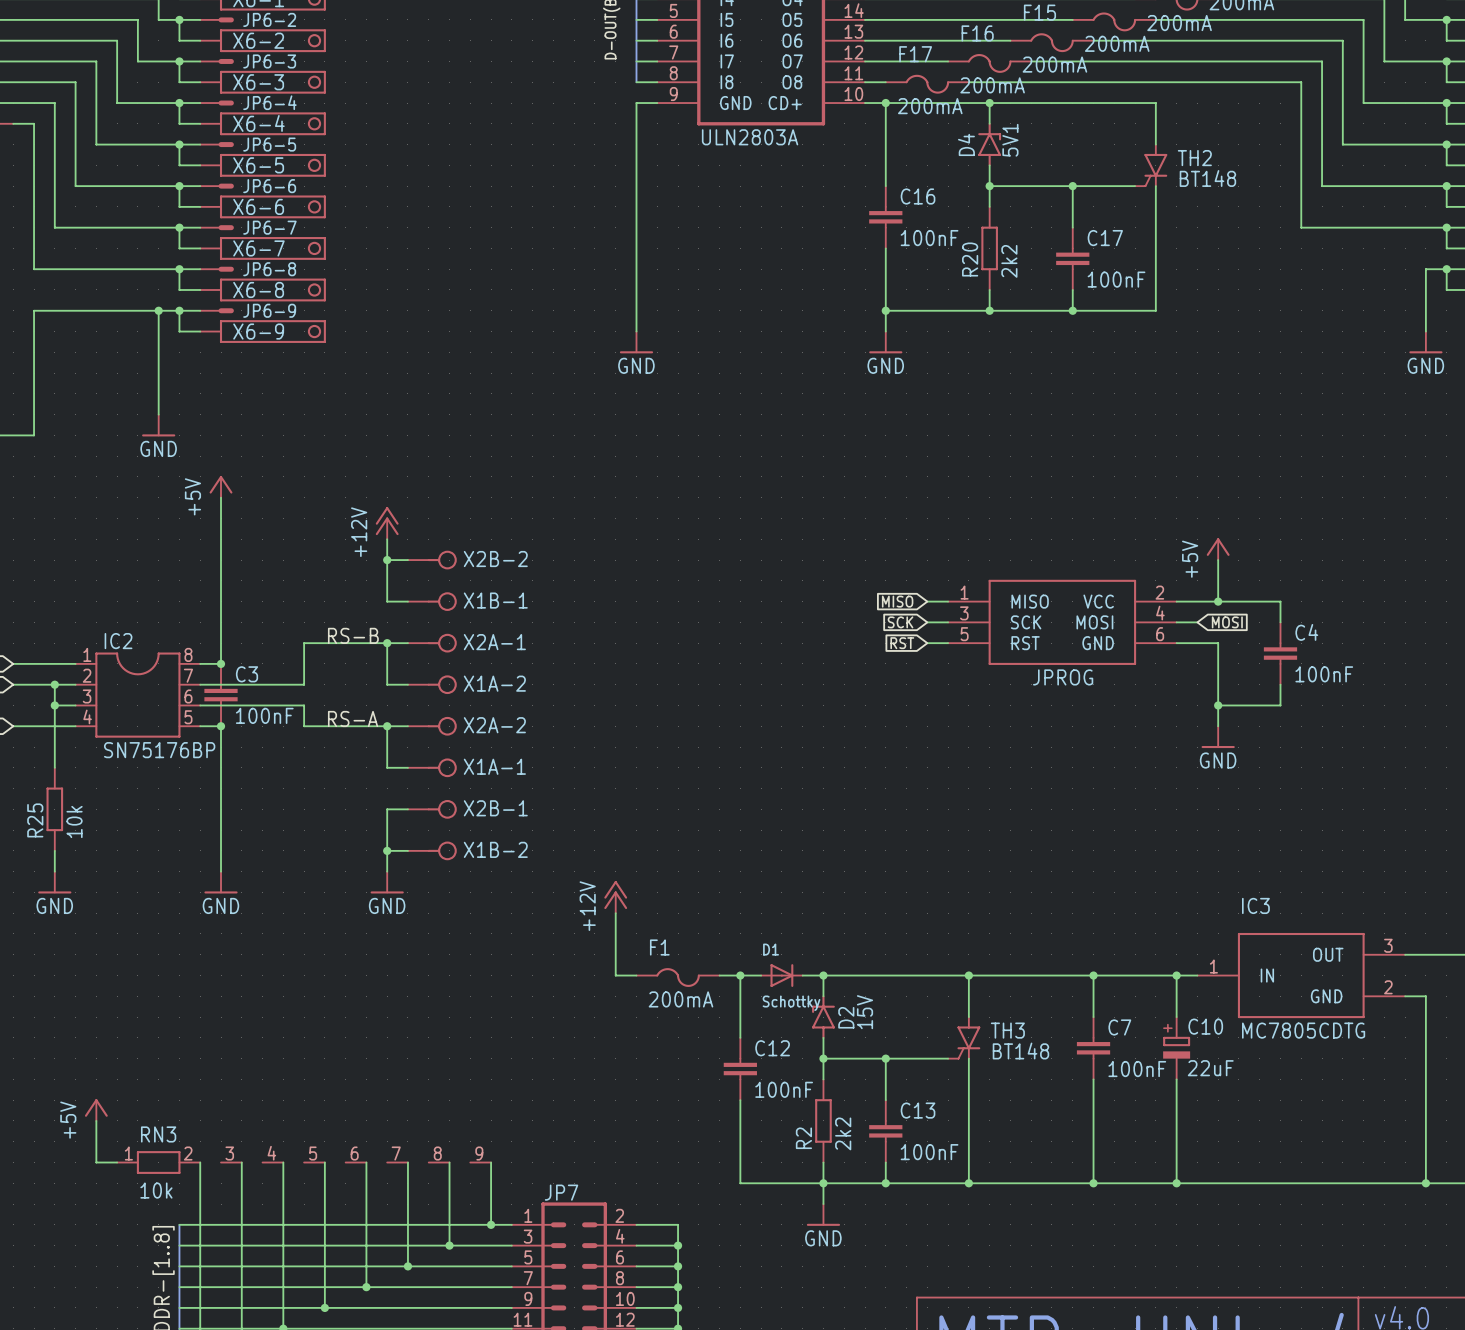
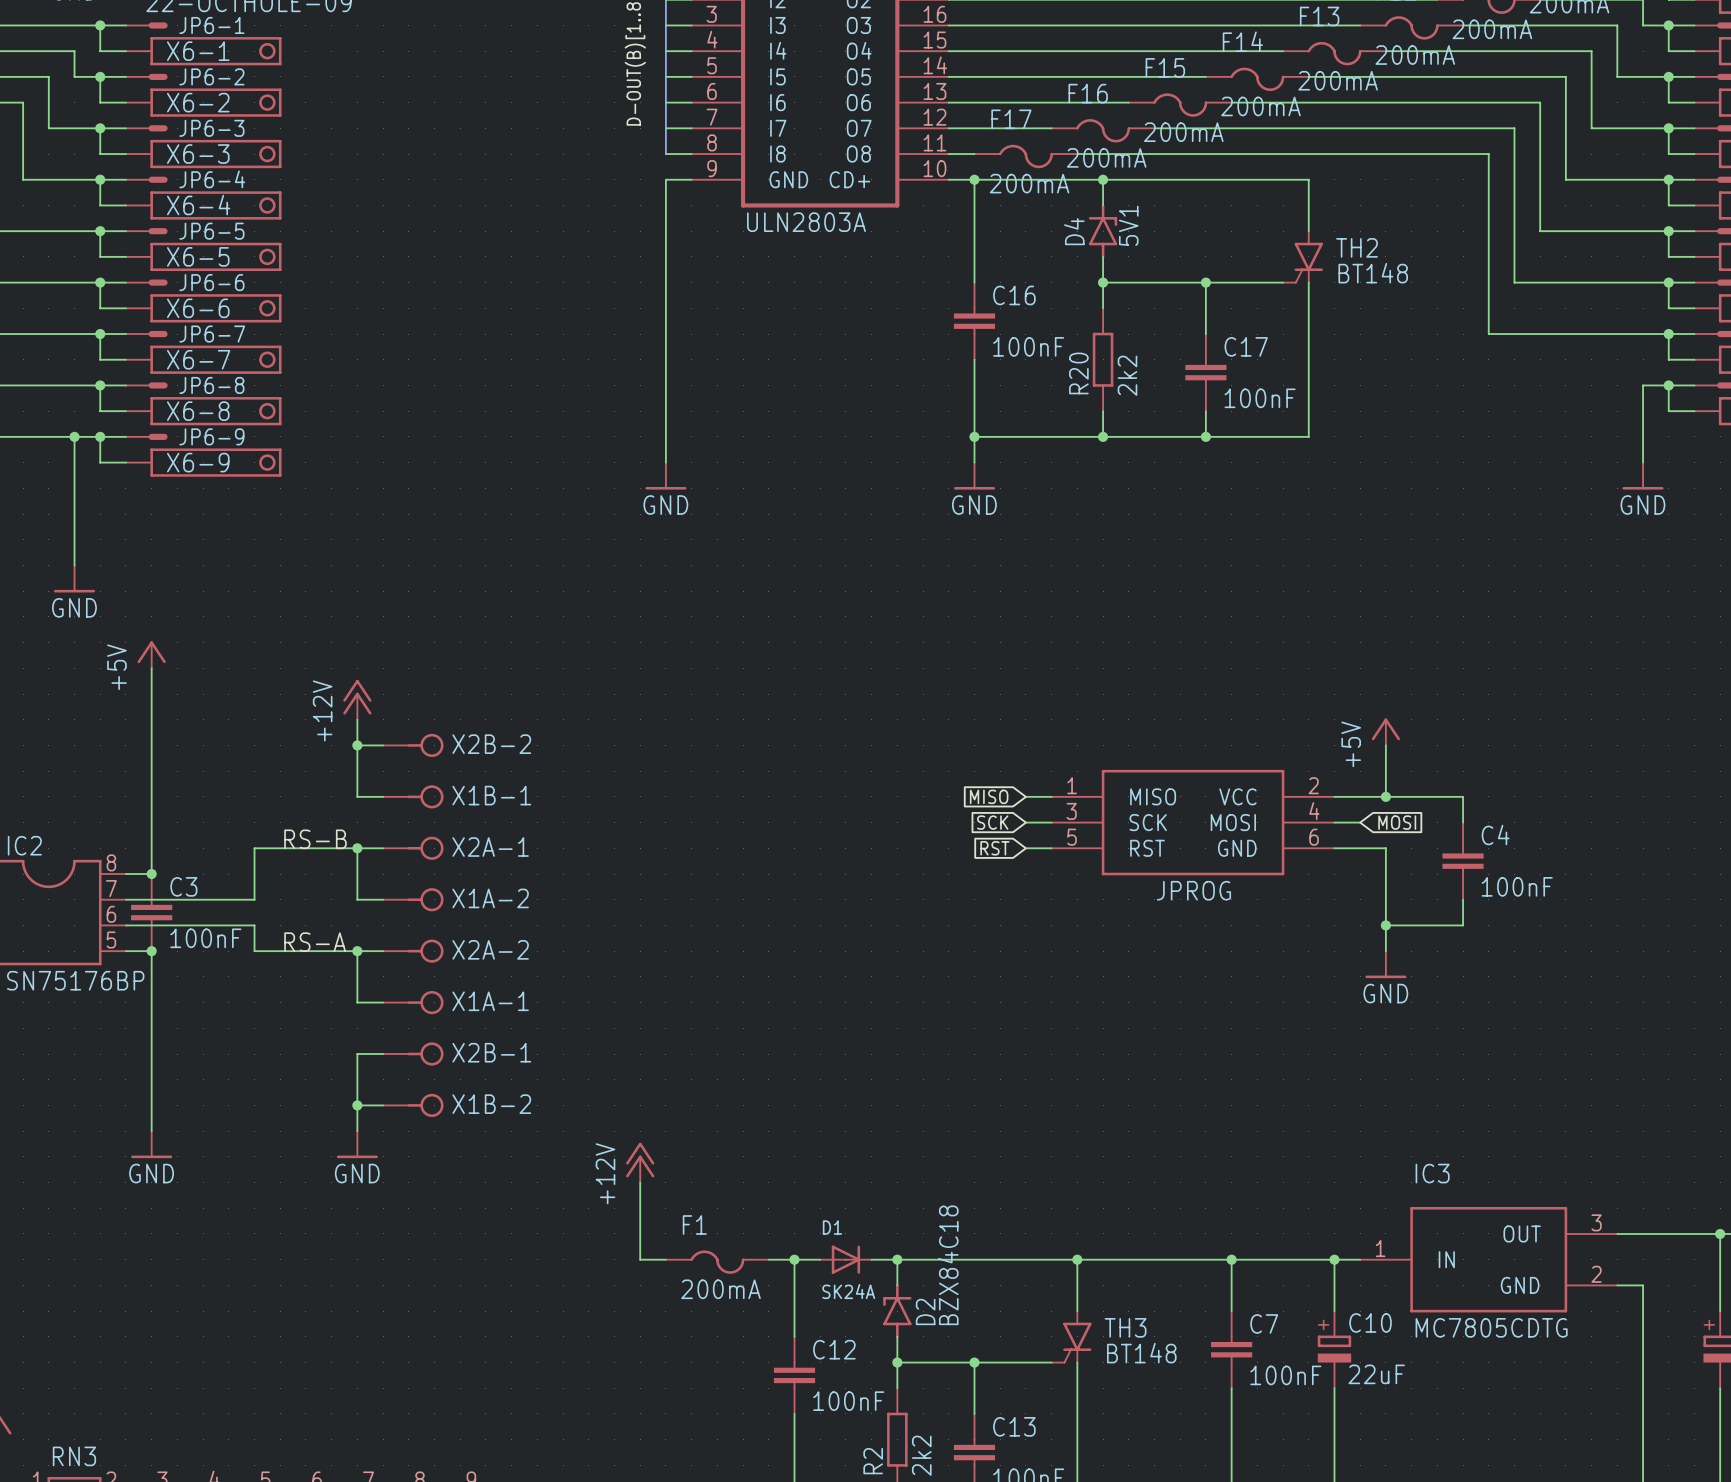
D1 value: Schottky (791, 1003) -> SK24A (848, 1291)
D2 value: 15V (865, 1012) -> BZX84C18 (948, 1265)

